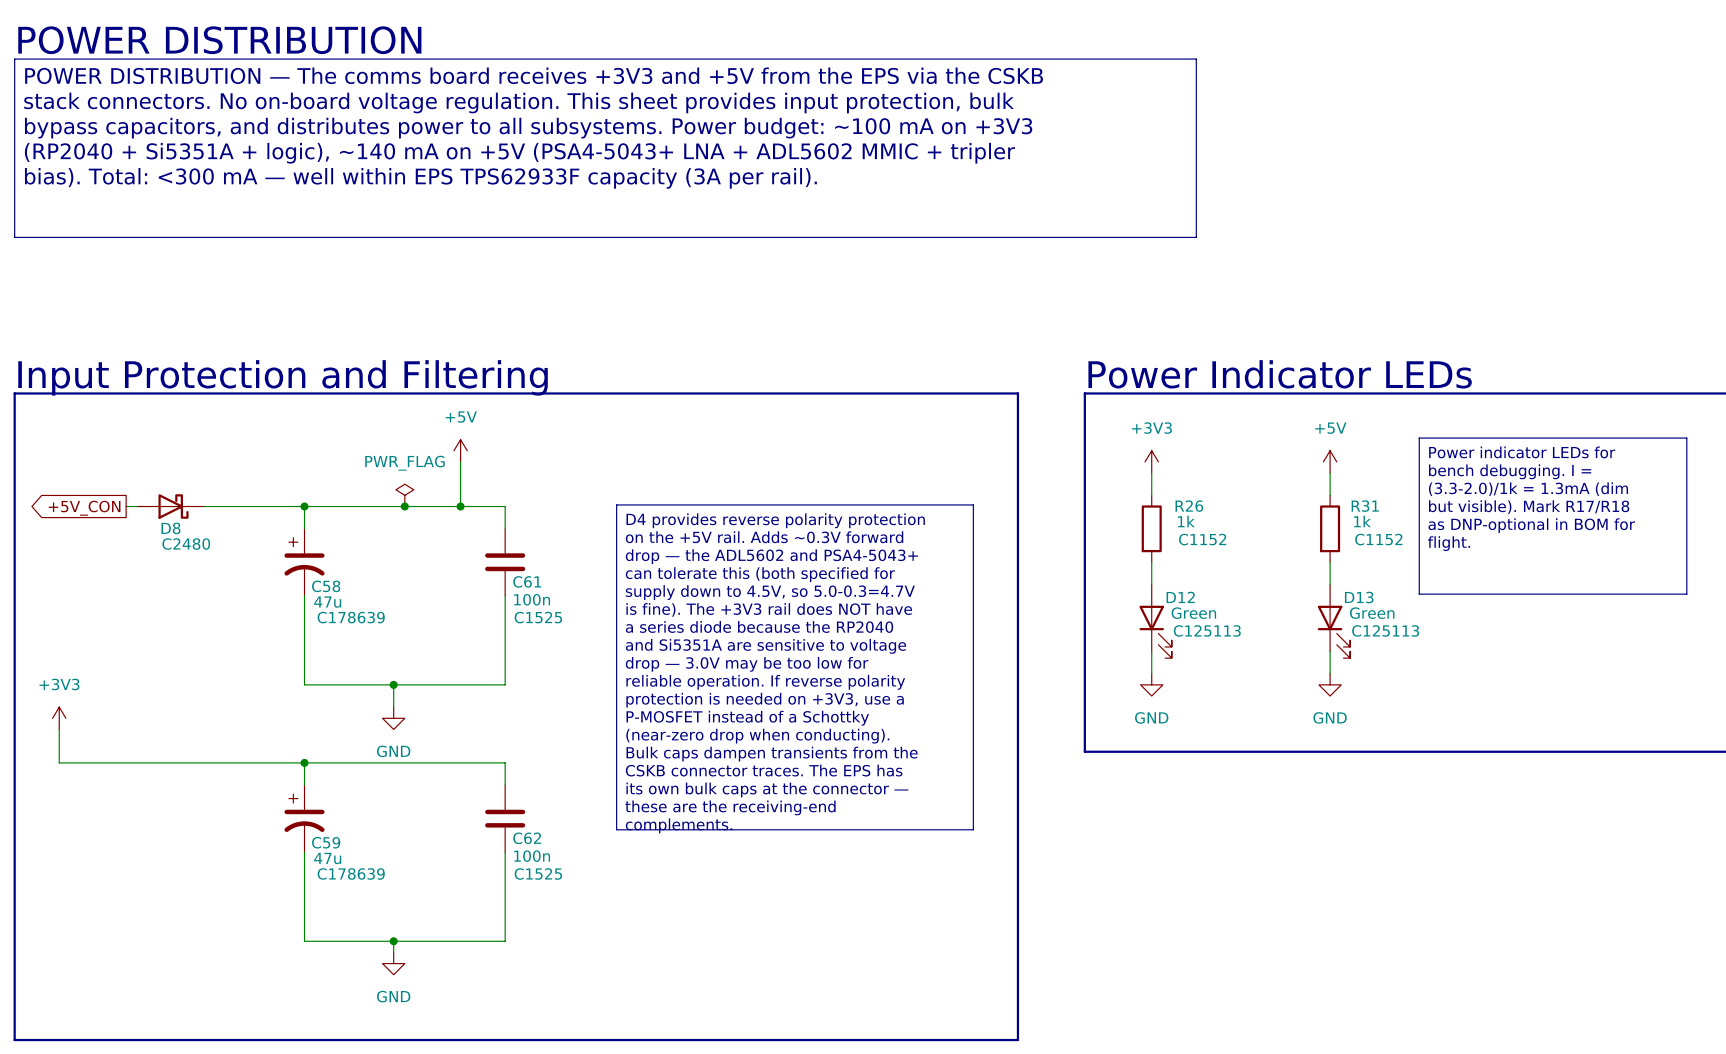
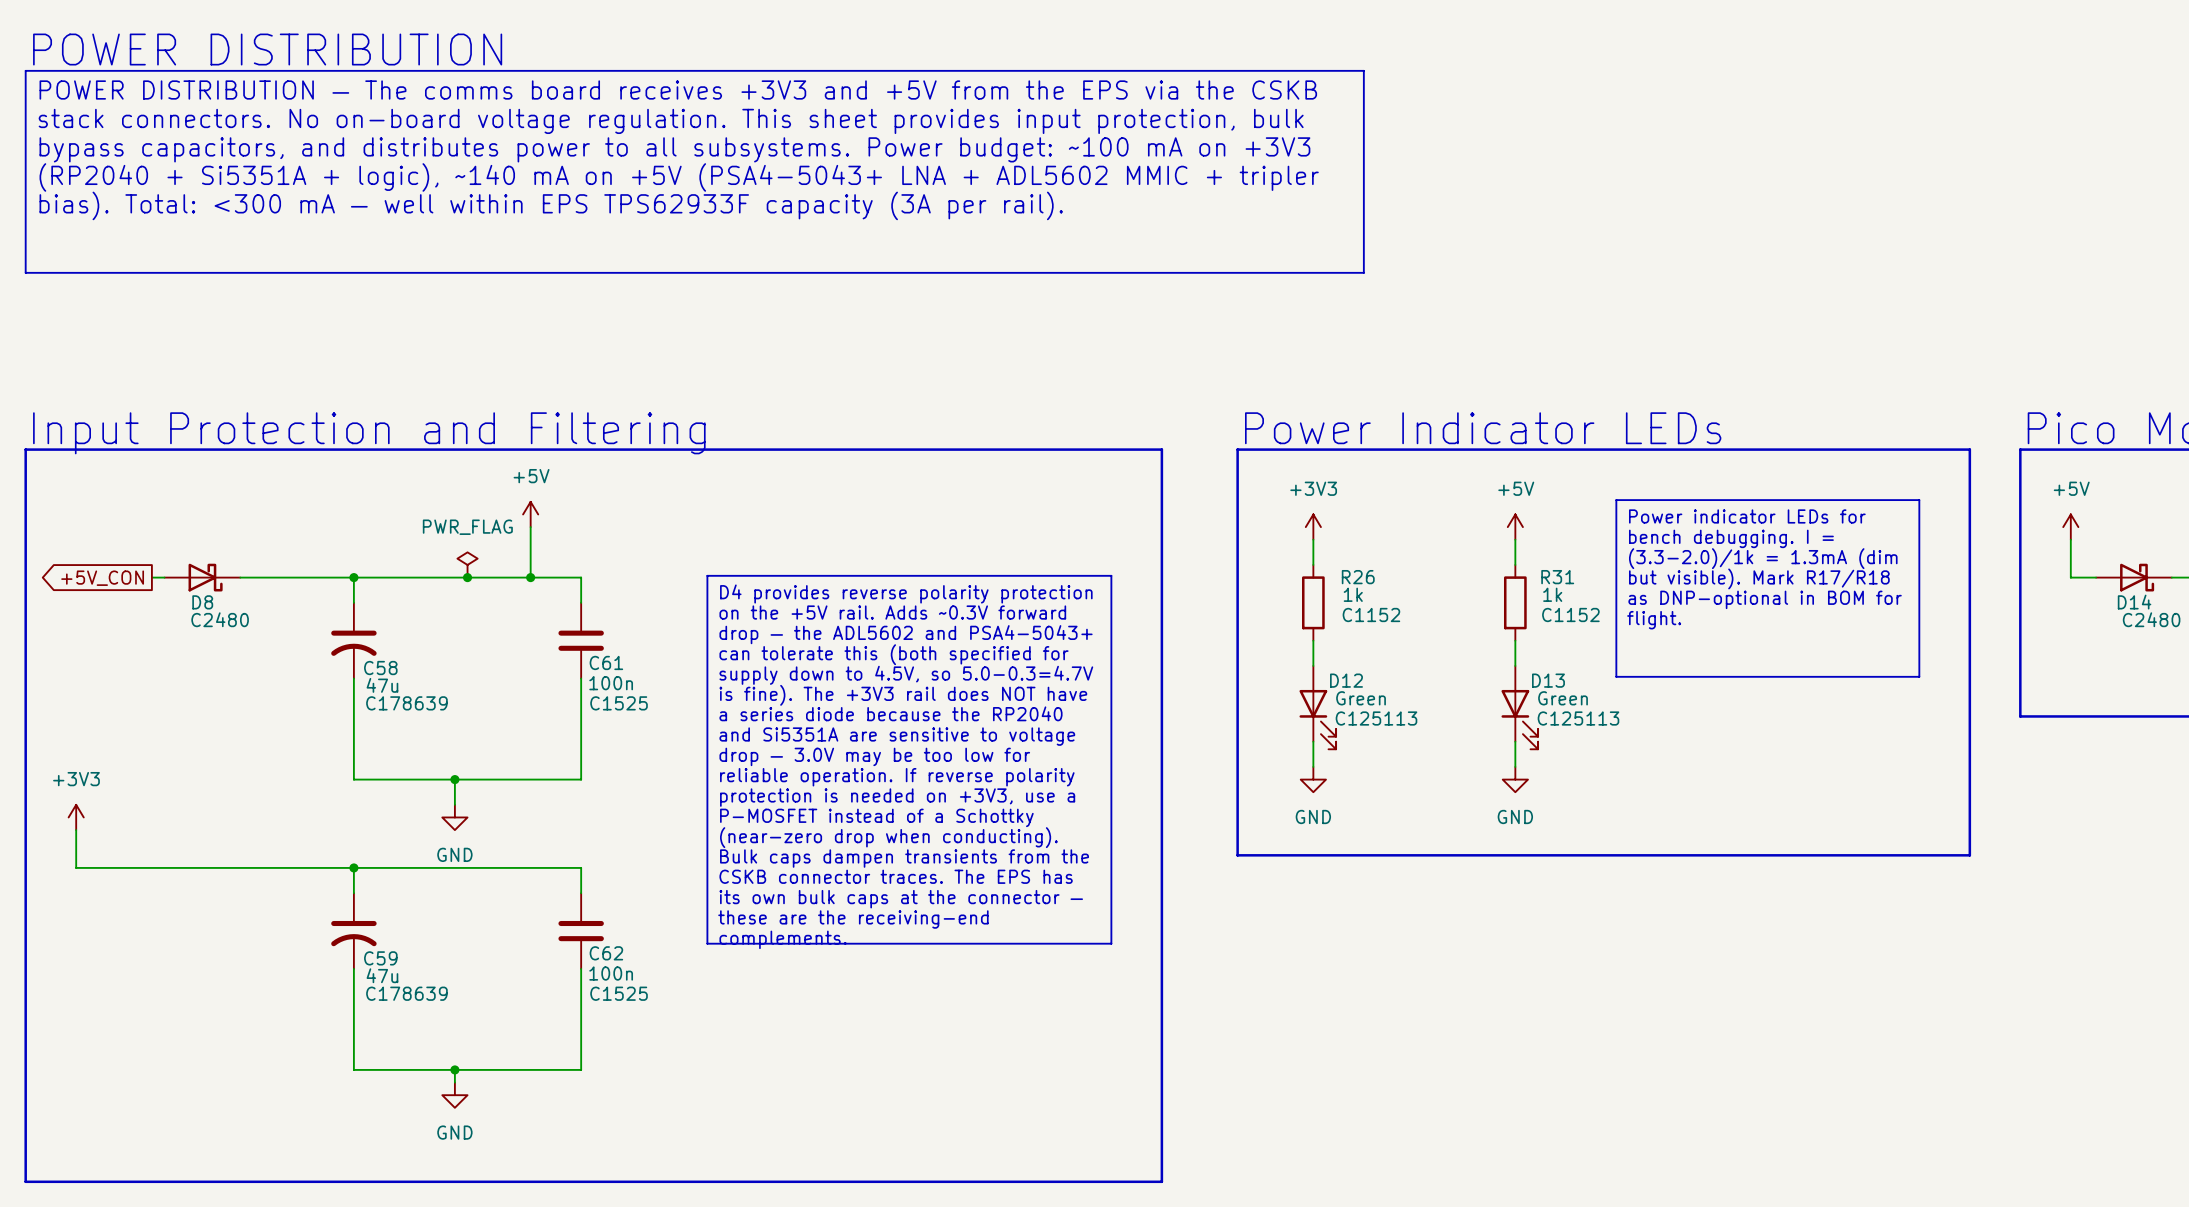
C58 symbol: [284, 528, 325, 596] -> [331, 602, 377, 679]
C59 symbol: [284, 785, 325, 853] -> [331, 893, 377, 969]

